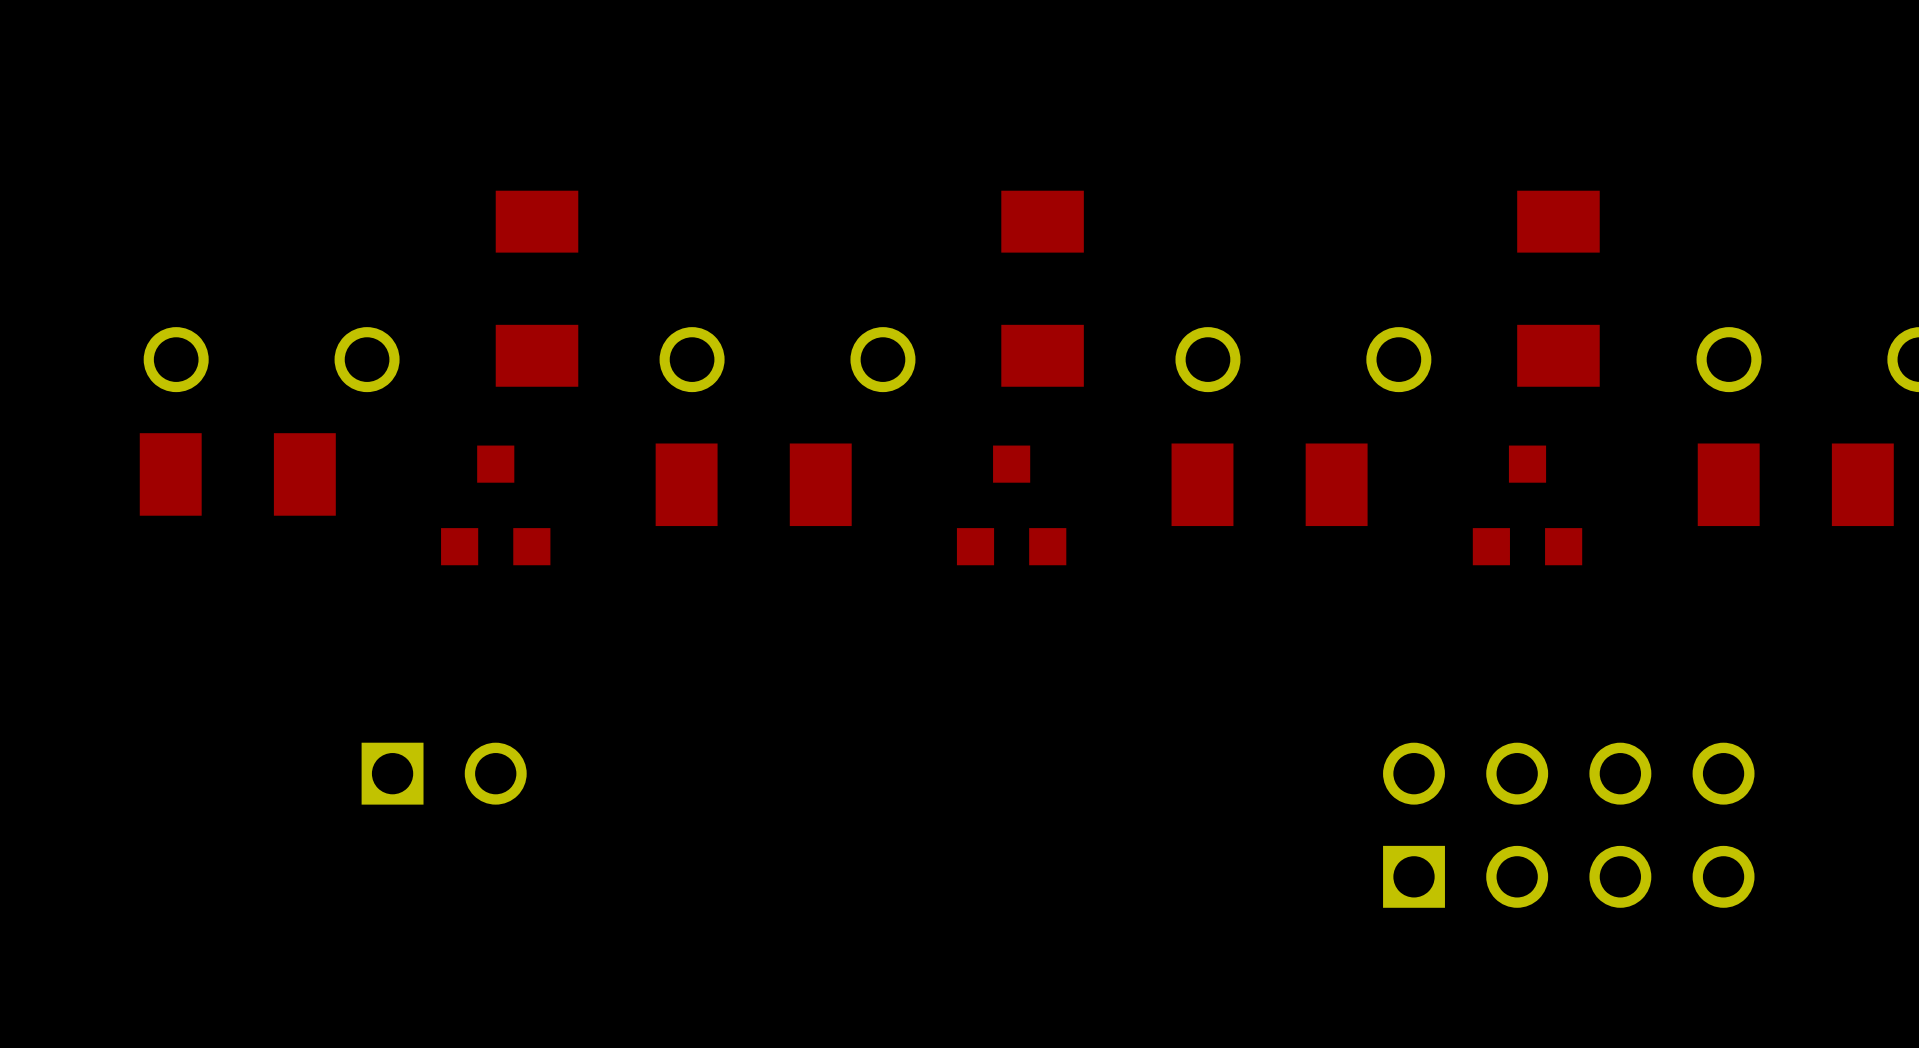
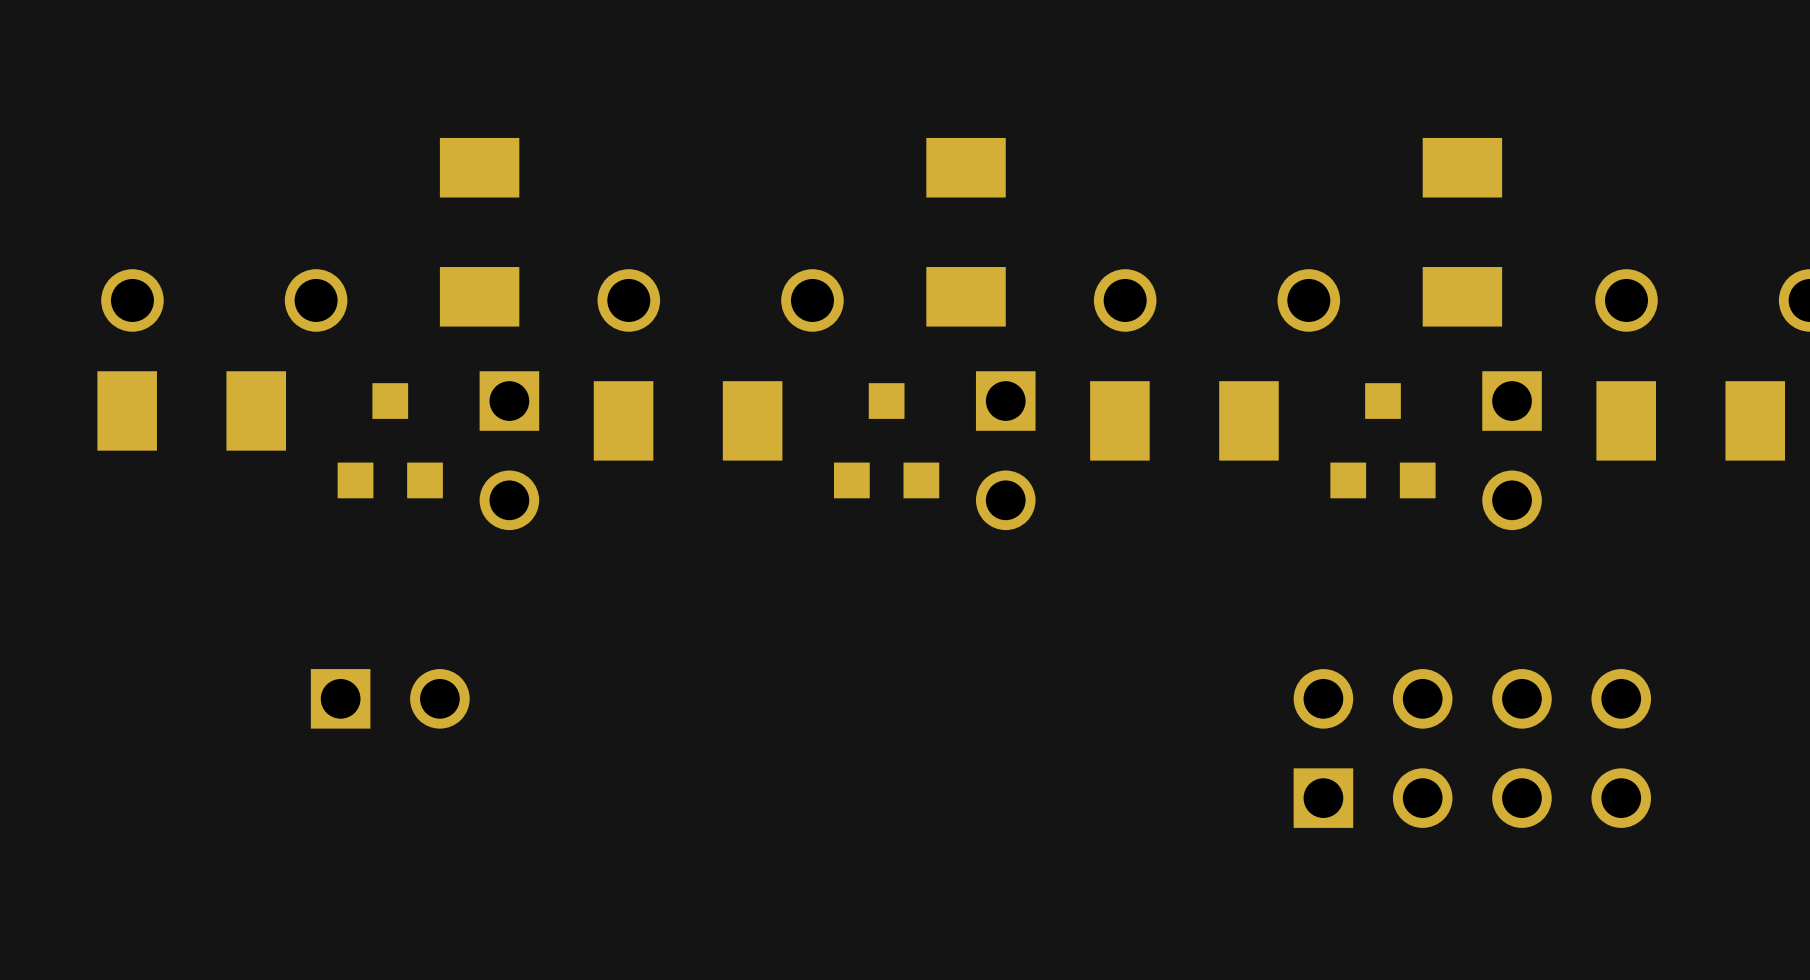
part position: (495, 505) -> (390, 440)
part position: (1011, 505) -> (886, 440)
part position: (1527, 505) -> (1382, 440)
part: none -> (509, 450)
part: none -> (1005, 450)
part: none -> (1512, 450)

